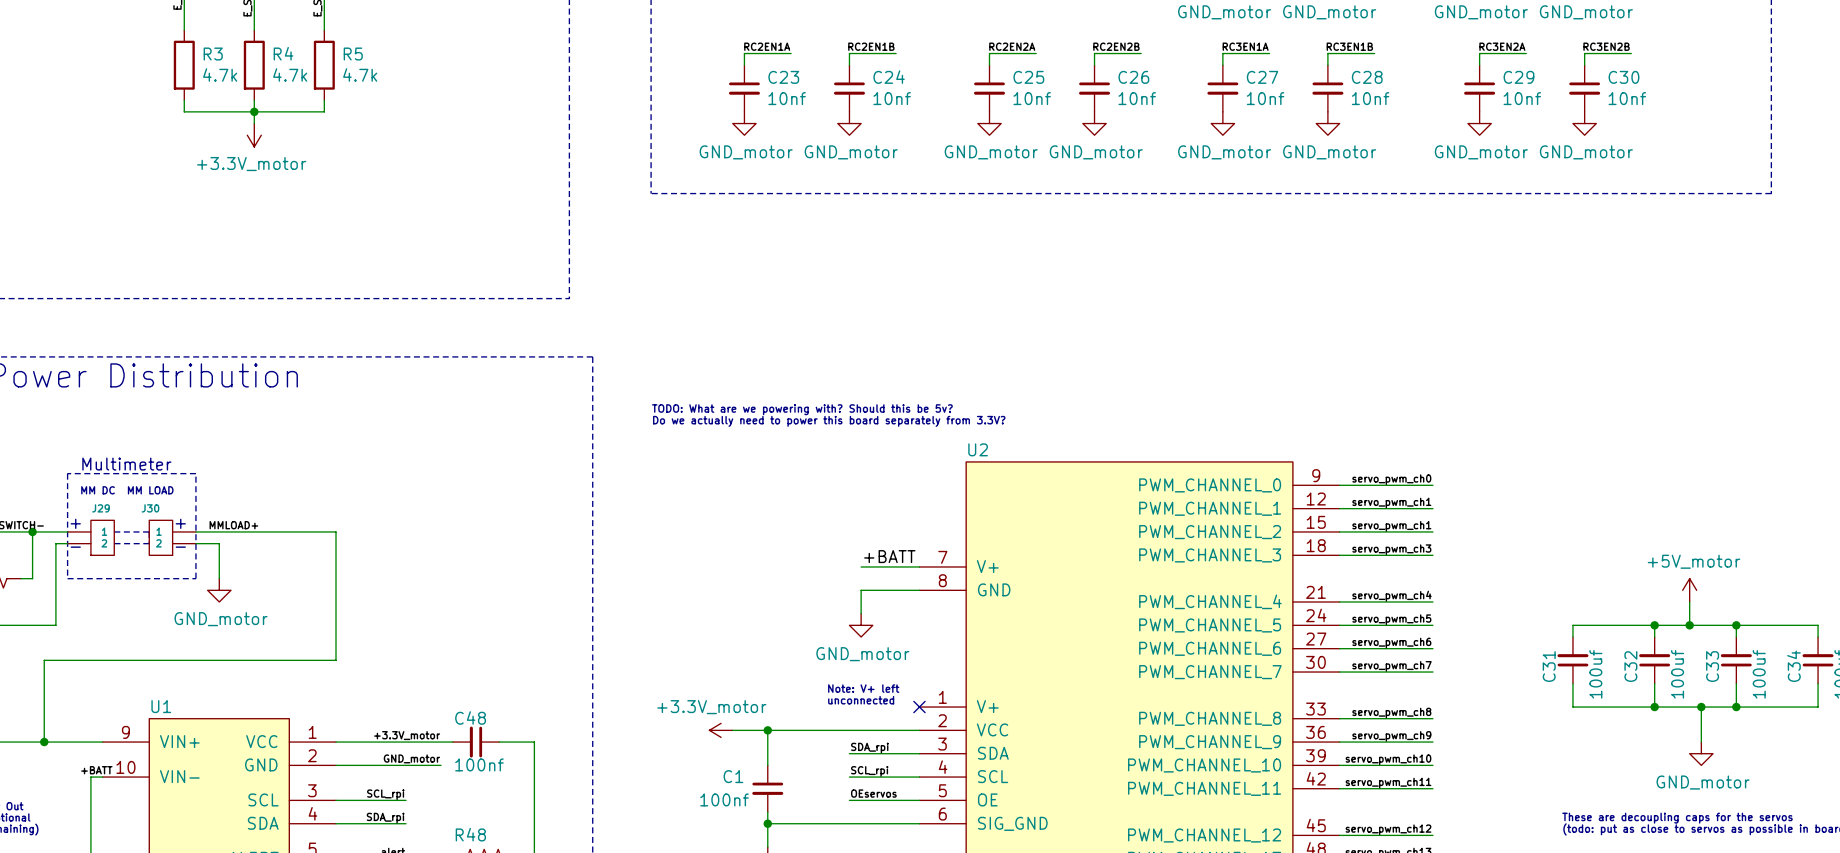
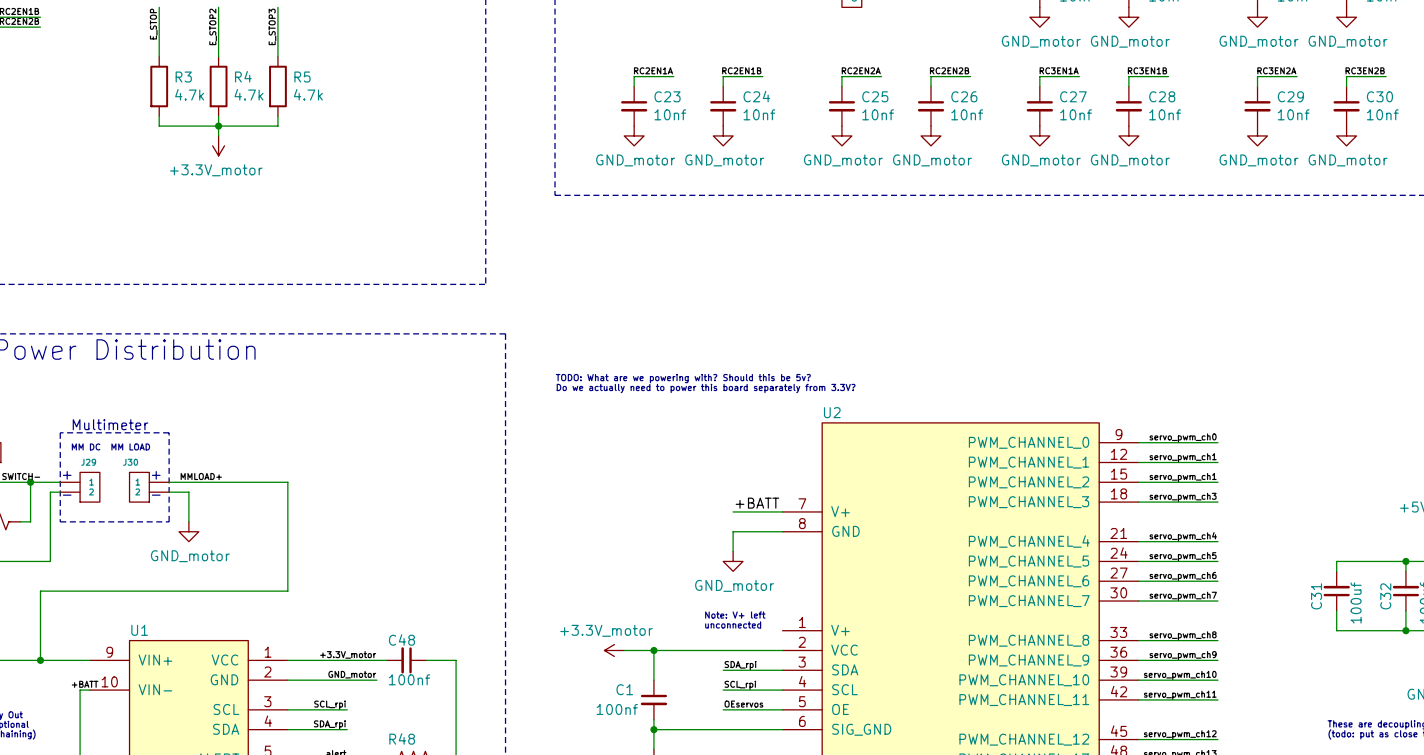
line: (114, 531) (149, 531) (149, 543) (114, 543) -> none
no-connect mark: (919, 707) -> none

